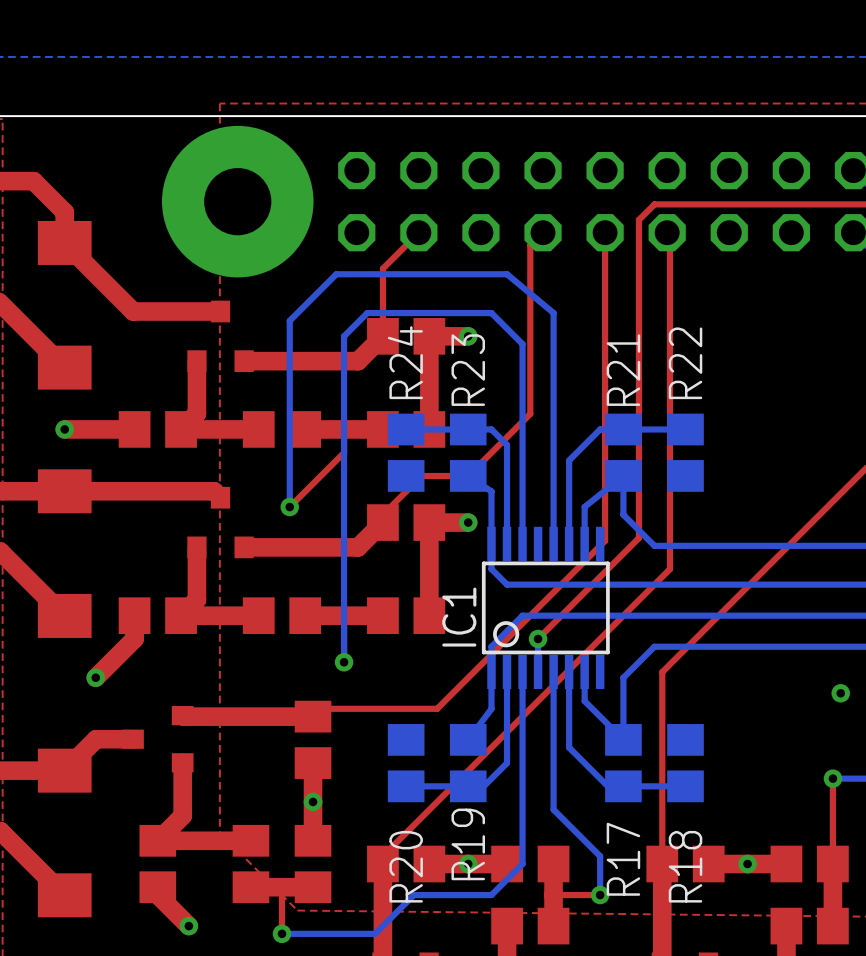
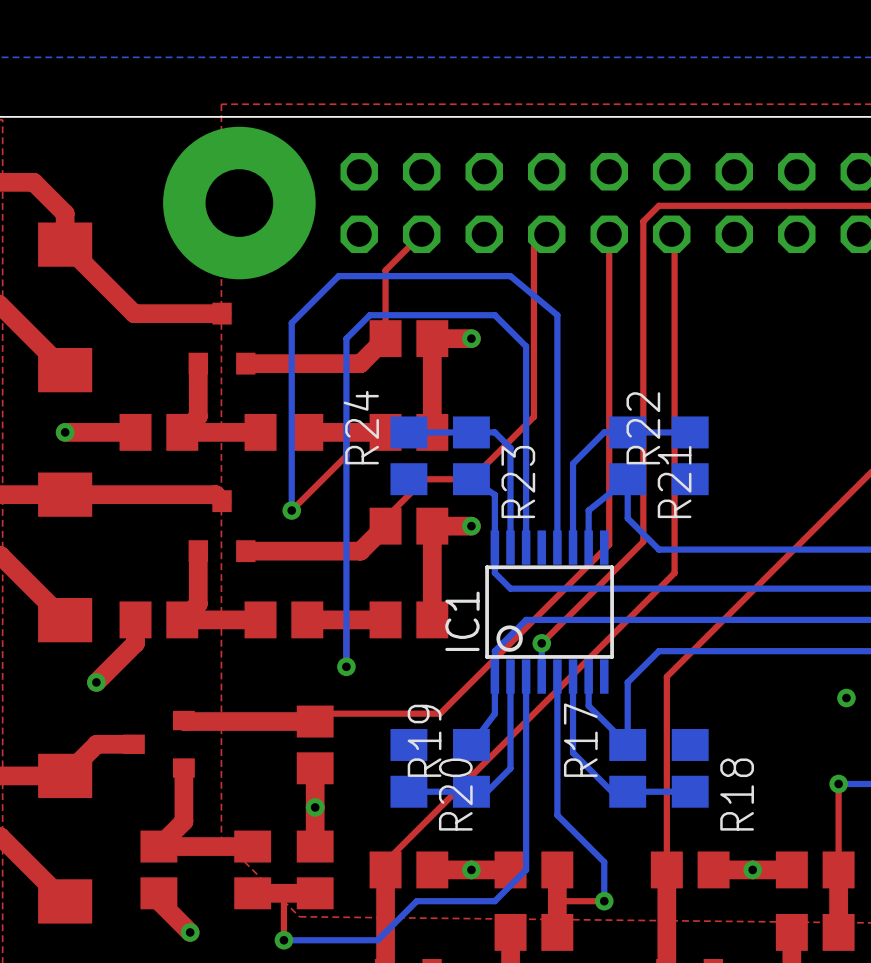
R24 name position: R24 (405, 362) -> R24 (361, 427)
R22 name position: R22 (685, 363) -> R22 (643, 428)
R23 name position: R23 (468, 370) -> R23 (518, 482)
R21 name position: R21 (623, 370) -> R21 (674, 482)
R19 name position: R19 (468, 844) -> R19 (424, 740)
R17 name position: R17 (623, 859) -> R17 (580, 740)
R20 name position: R20 (406, 866) -> R20 (455, 794)
R18 name position: R18 (685, 866) -> R18 (737, 794)

